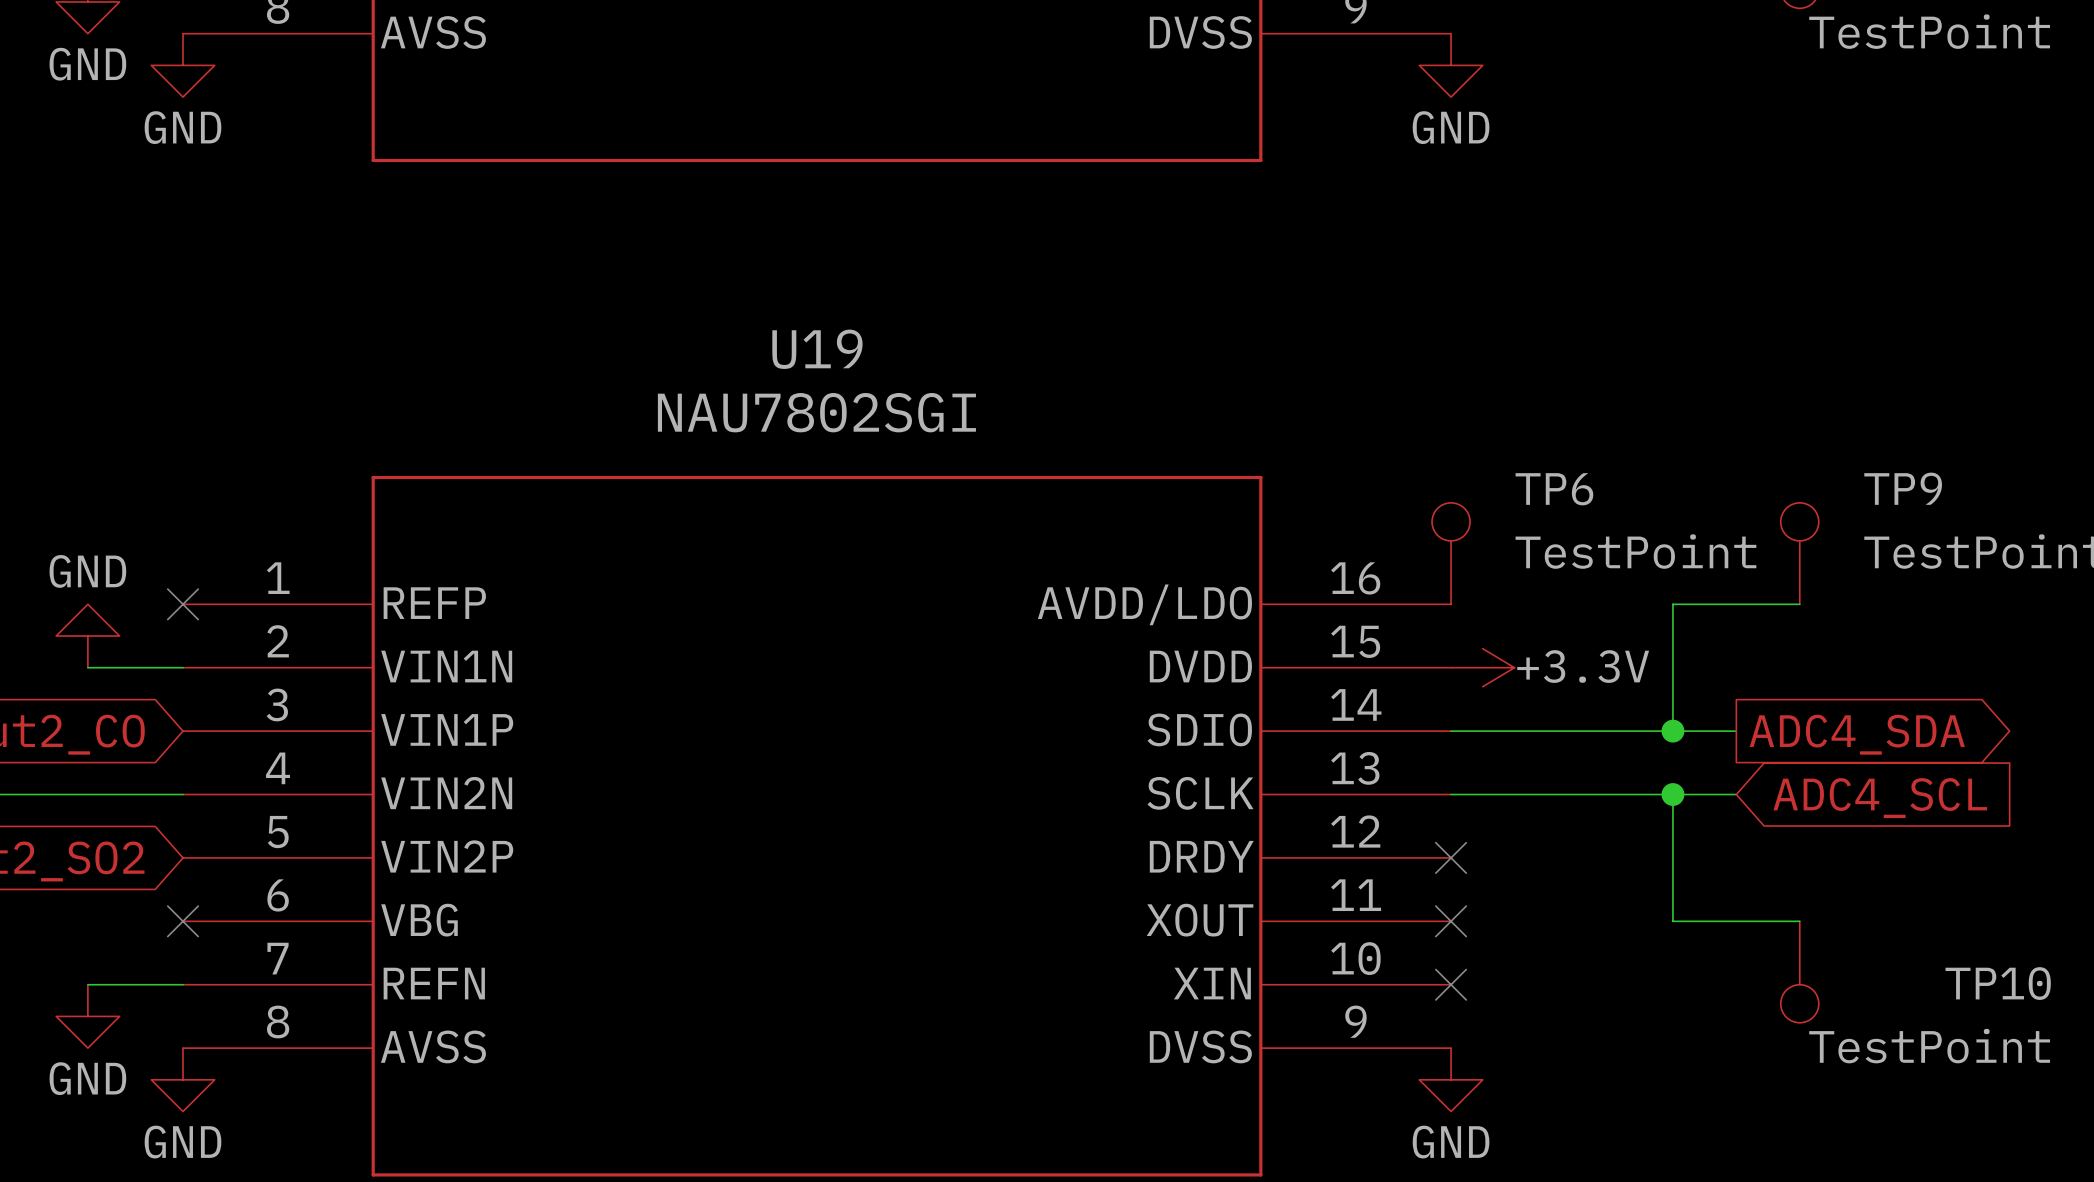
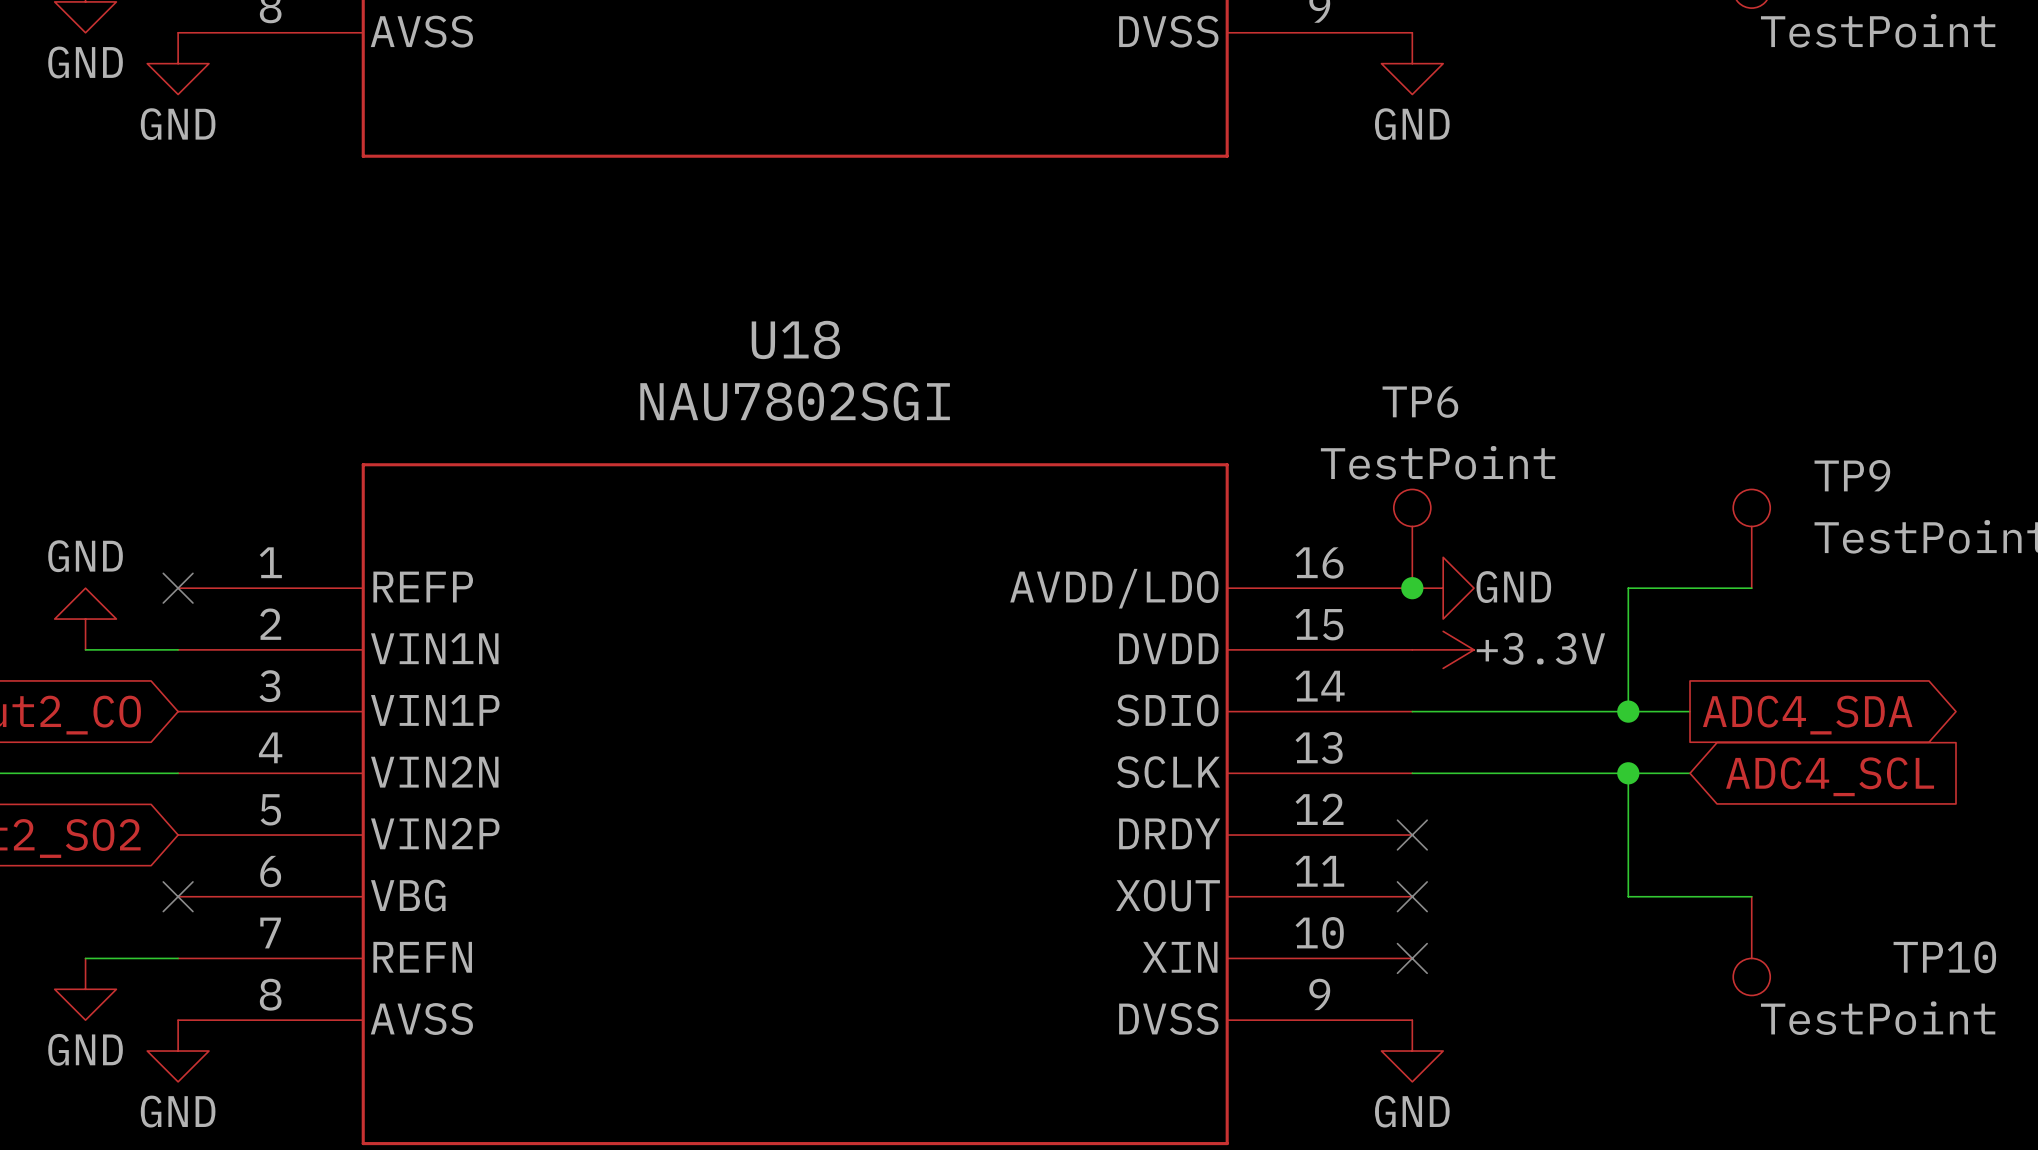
U19 name: U19 (817, 349) -> U18 (795, 339)
TP6 name position: TP6 (1554, 489) -> TP6 (1420, 402)
TP6 value position: TestPoint (1635, 551) -> TestPoint (1438, 462)
junction: none -> (1412, 588)
power symbol: none -> GND (1443, 588)

